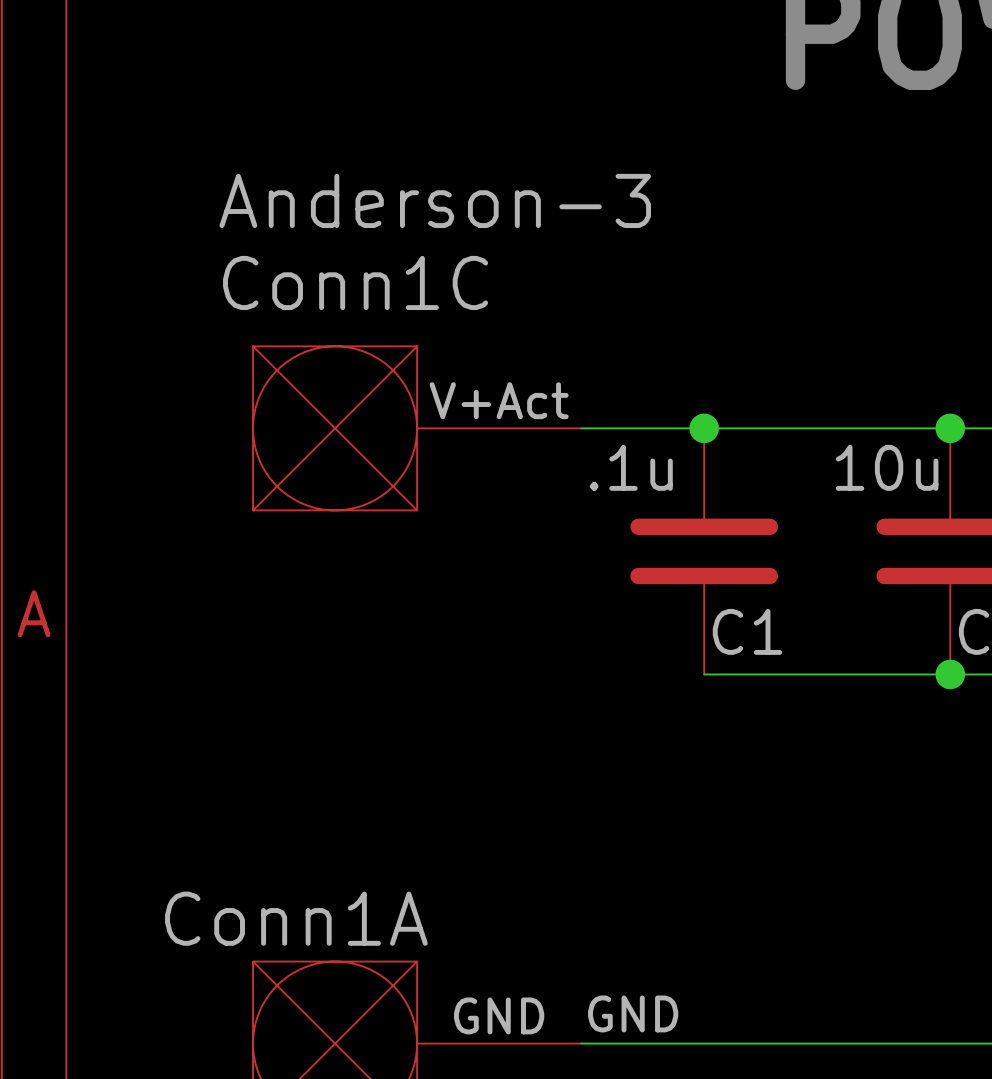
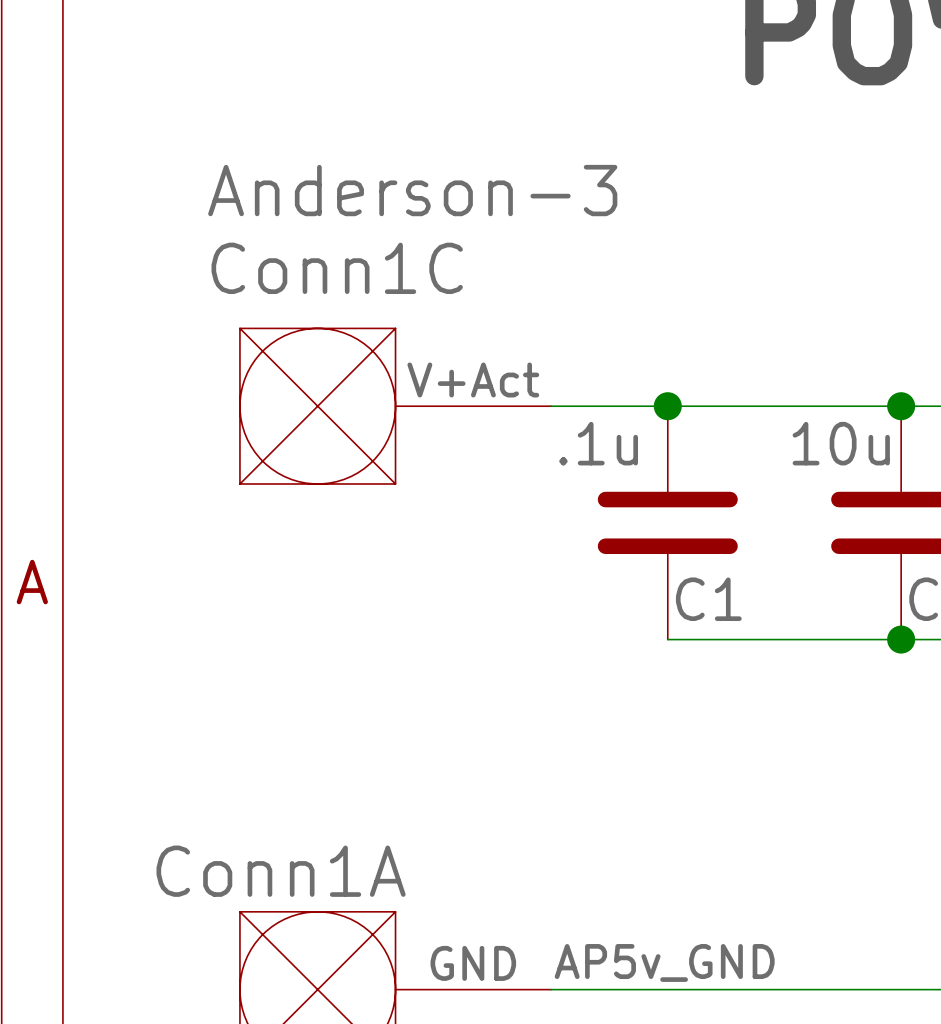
label: GND (633, 1013) -> AP5v_GND (664, 962)

